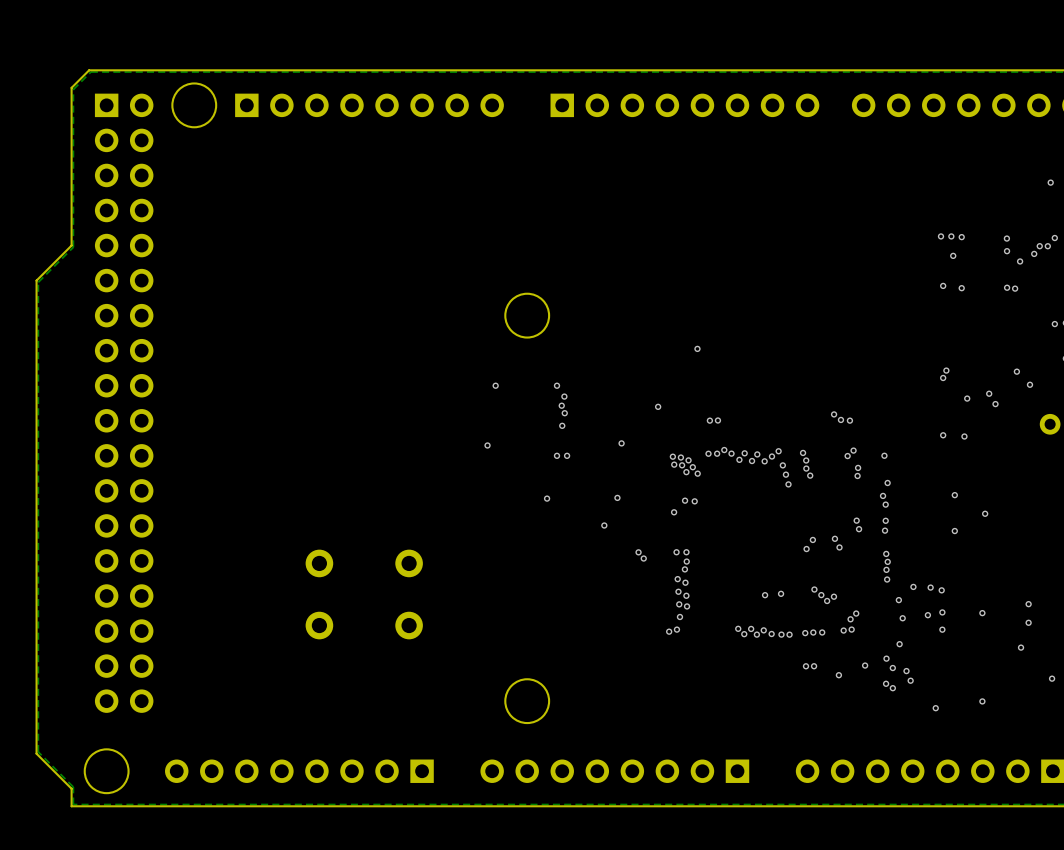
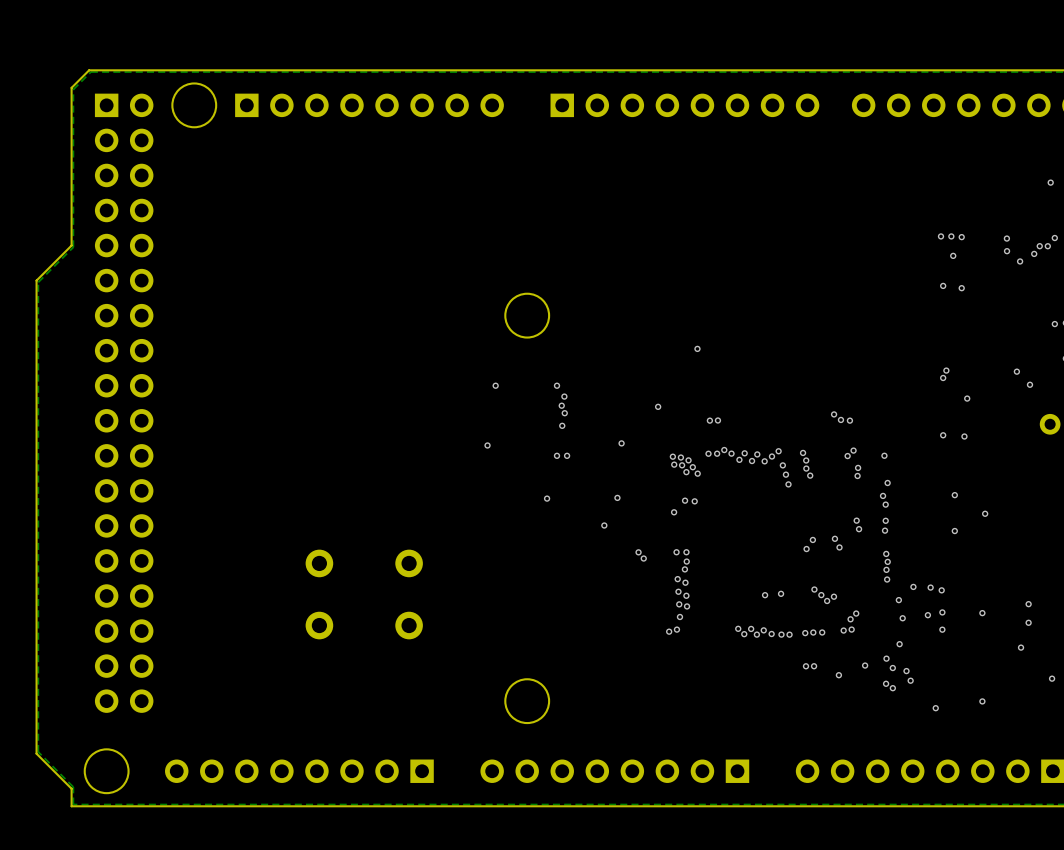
via: (1007, 287) -> none
via: (1015, 288) -> none
via: (989, 393) -> none
via: (995, 404) -> none

